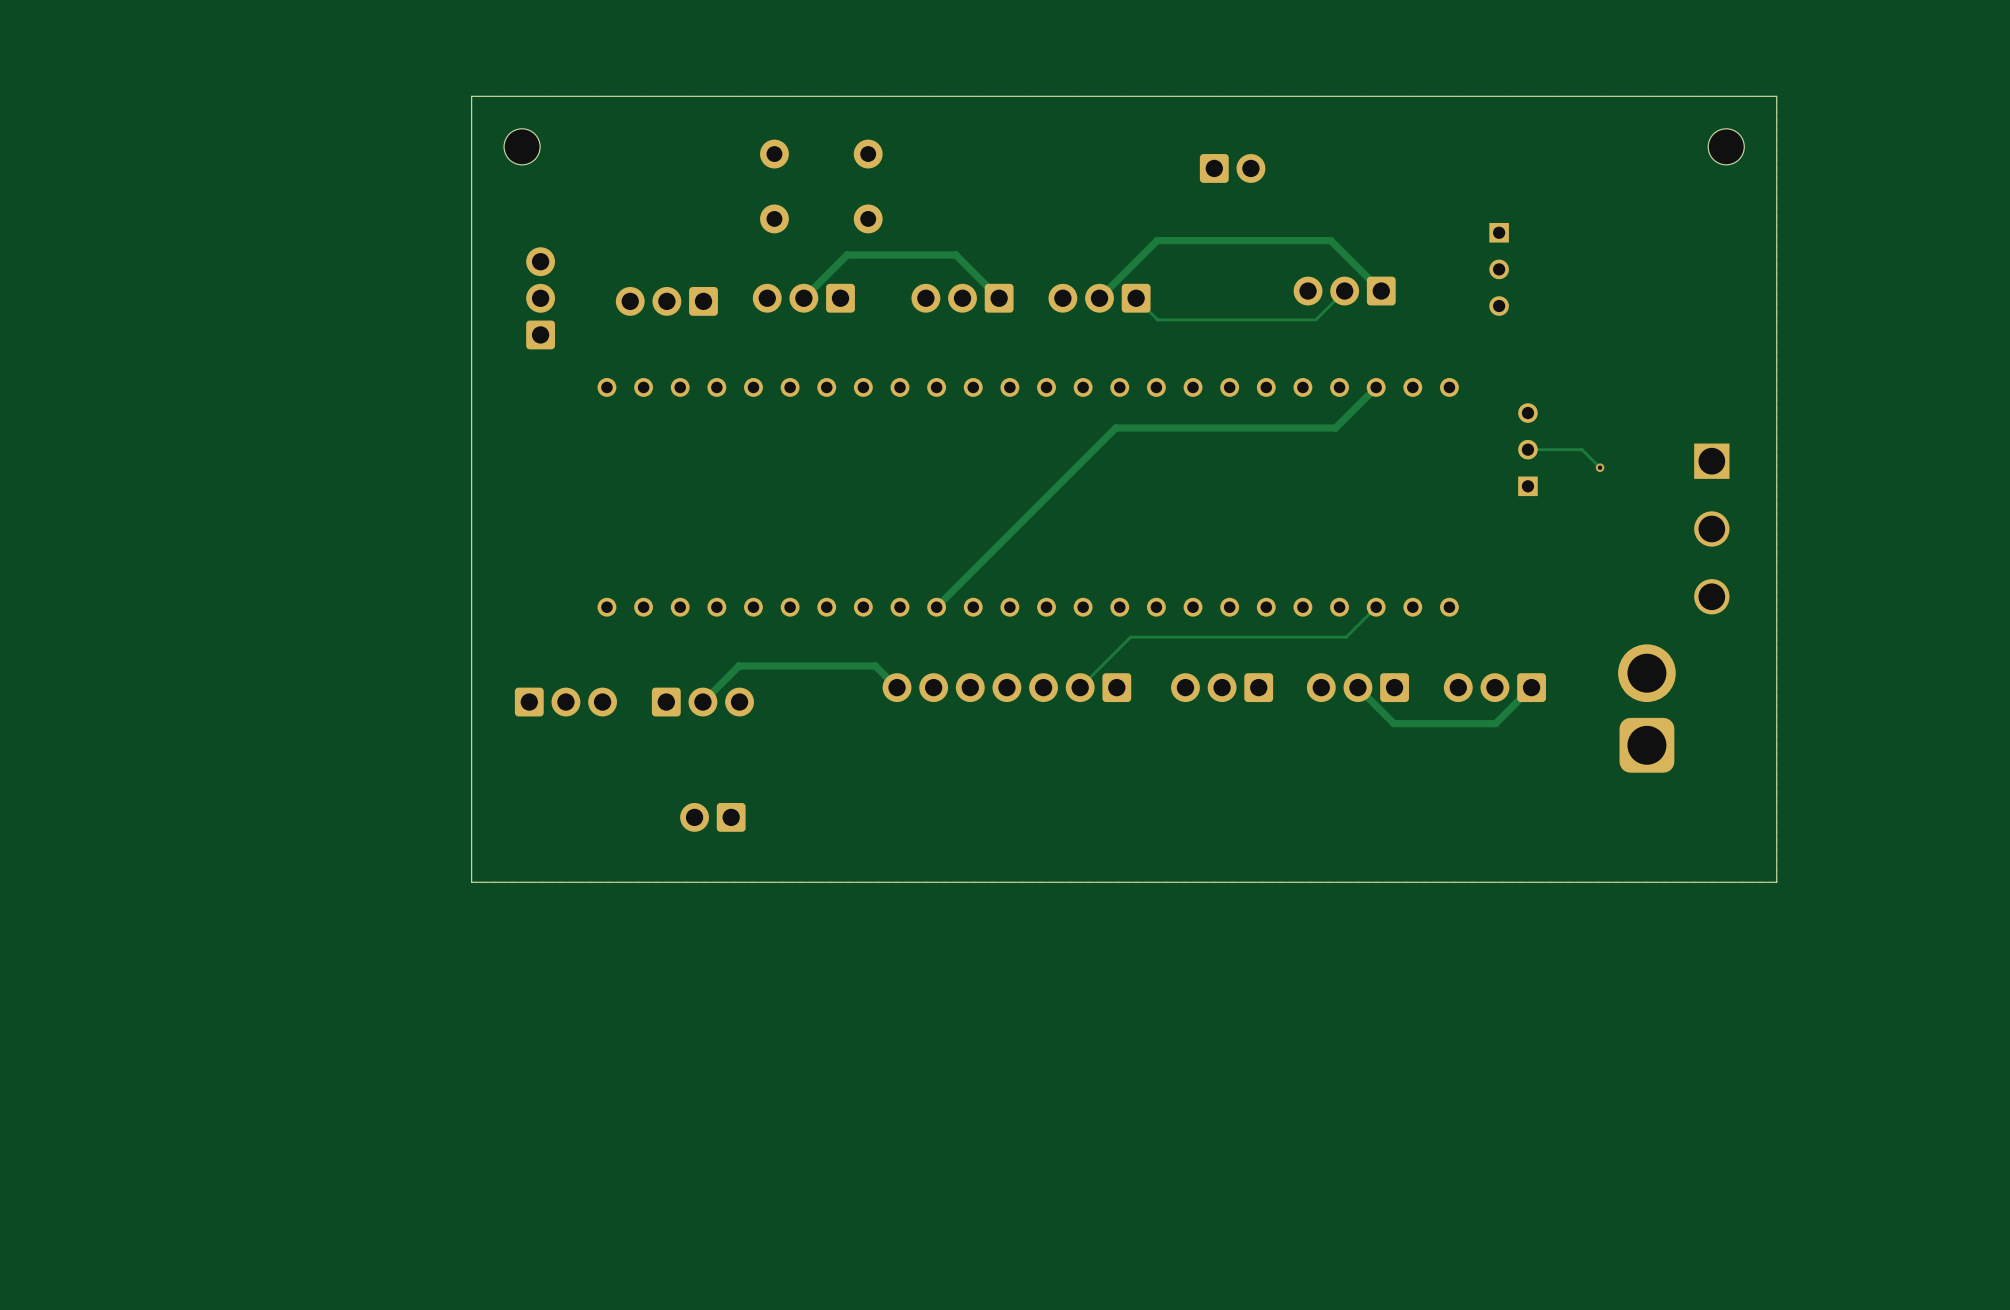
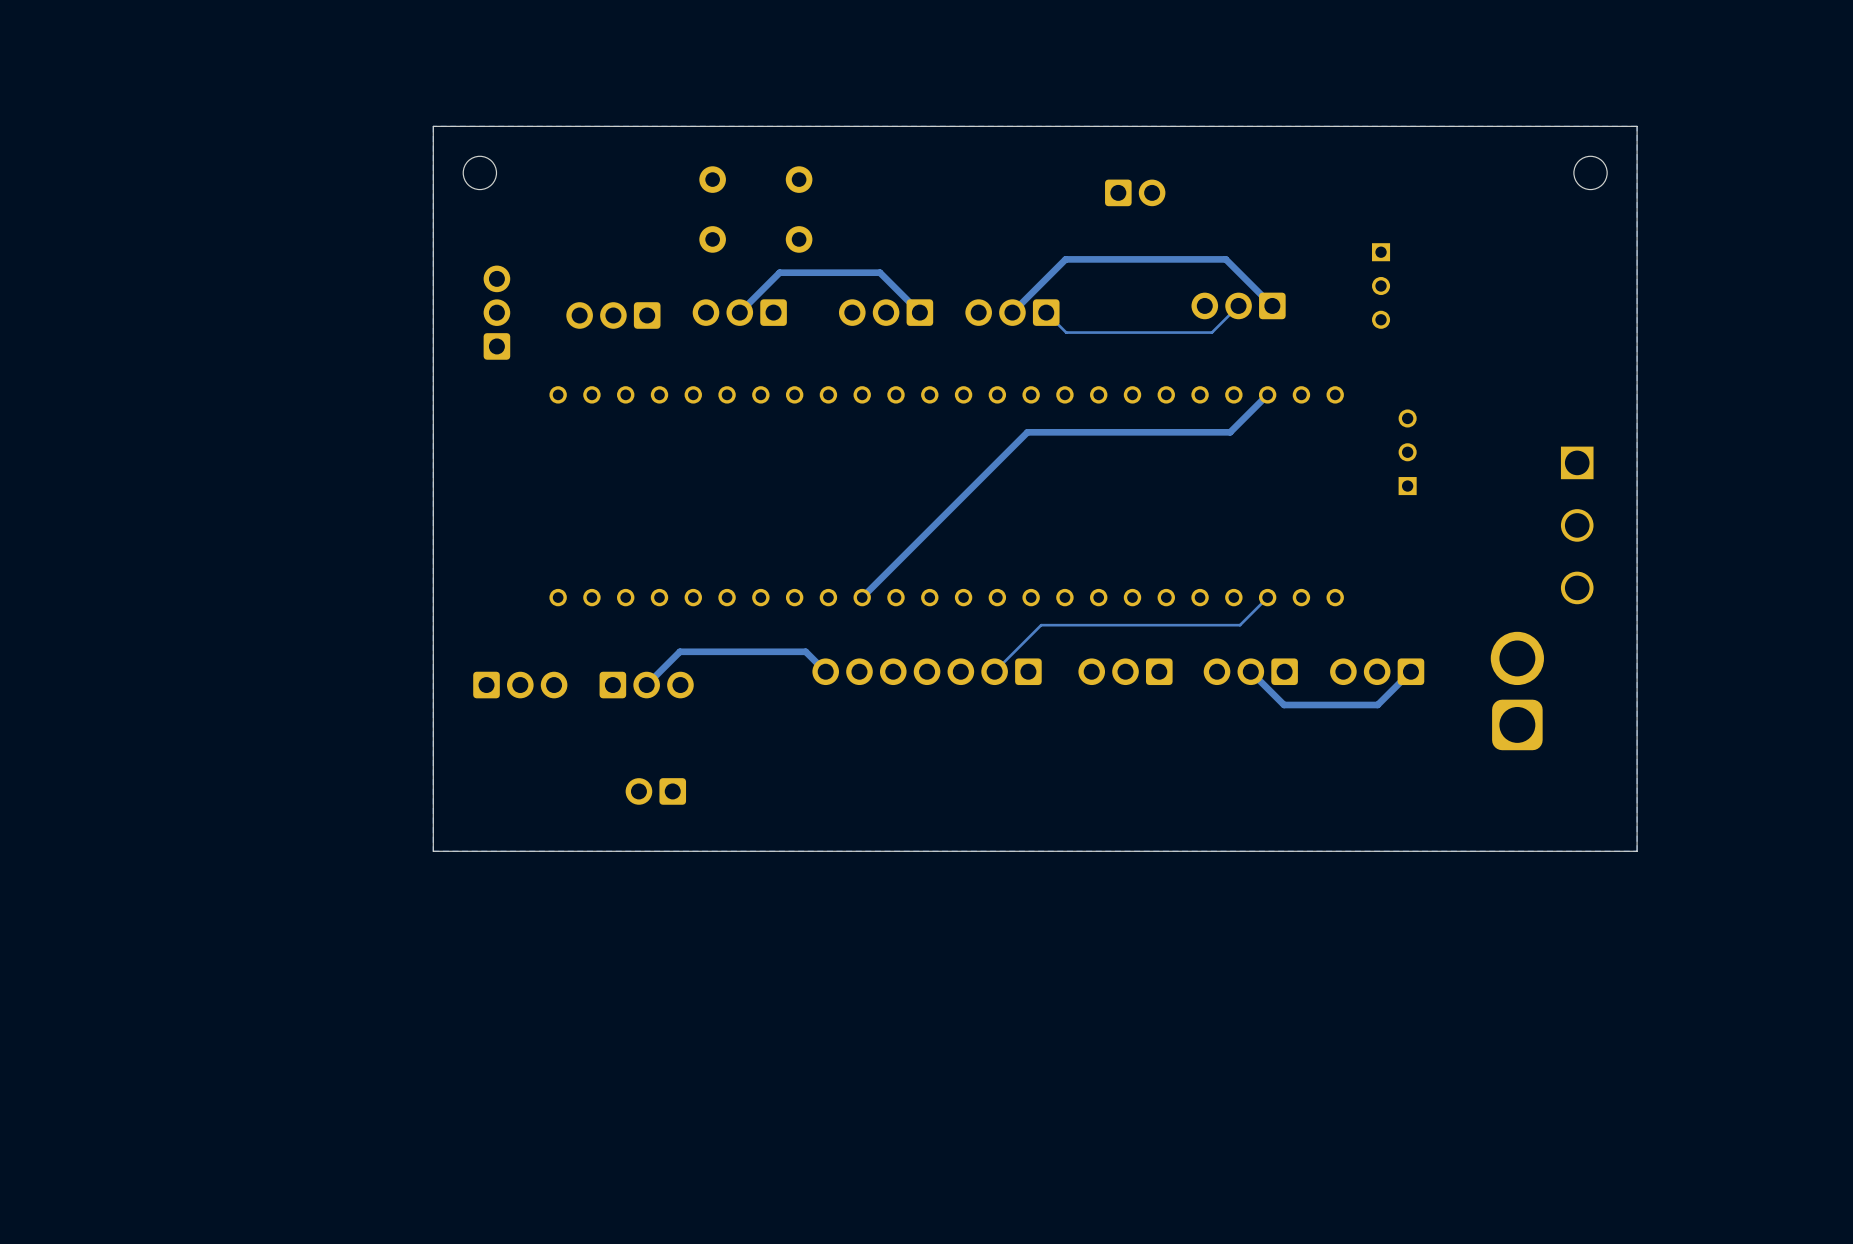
track: (1527, 449) (1582, 449) (1600, 467) -> none
via: (1600, 467) -> none

